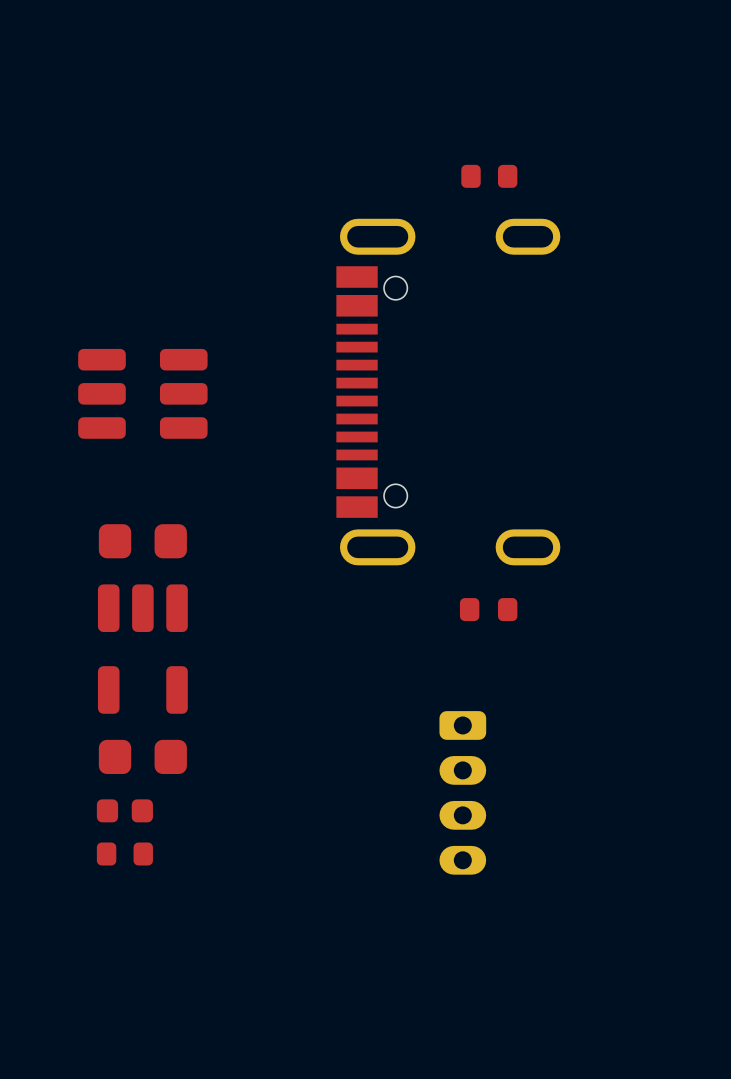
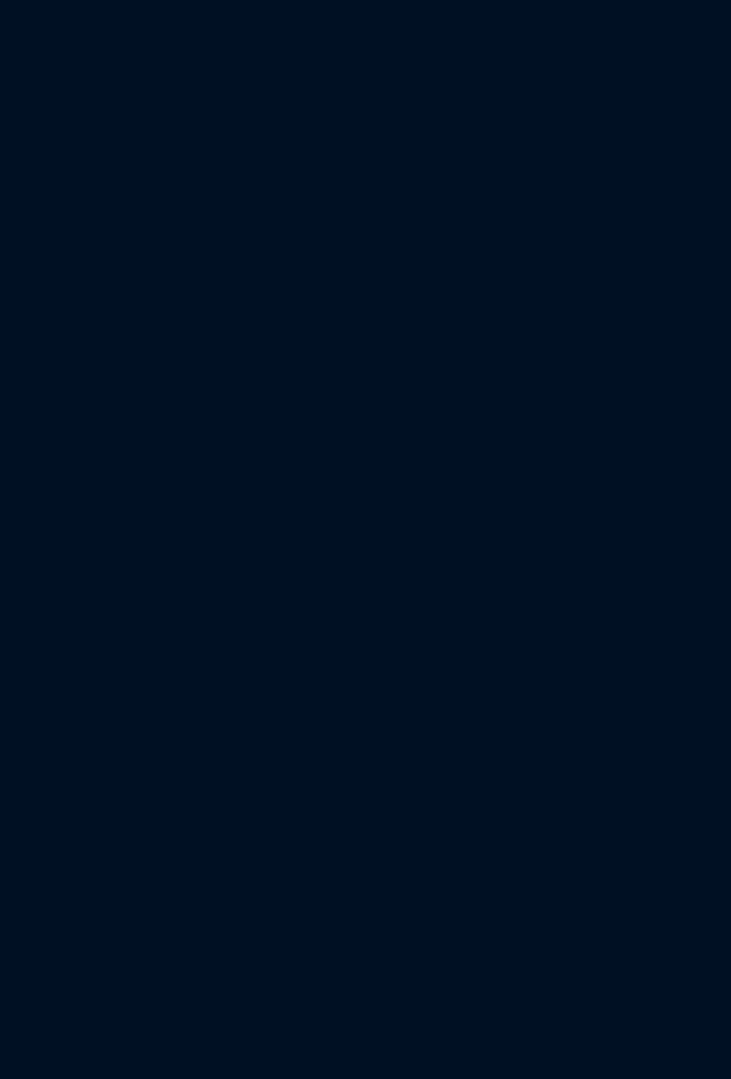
part: (489, 176) -> none
part: (448, 392) -> none
part: (142, 393) -> none
part: (142, 541) -> none
part: (488, 609) -> none
part: (142, 649) -> none
part: (142, 756) -> none
part: (462, 792) -> none
part: (124, 810) -> none
part: (124, 853) -> none

